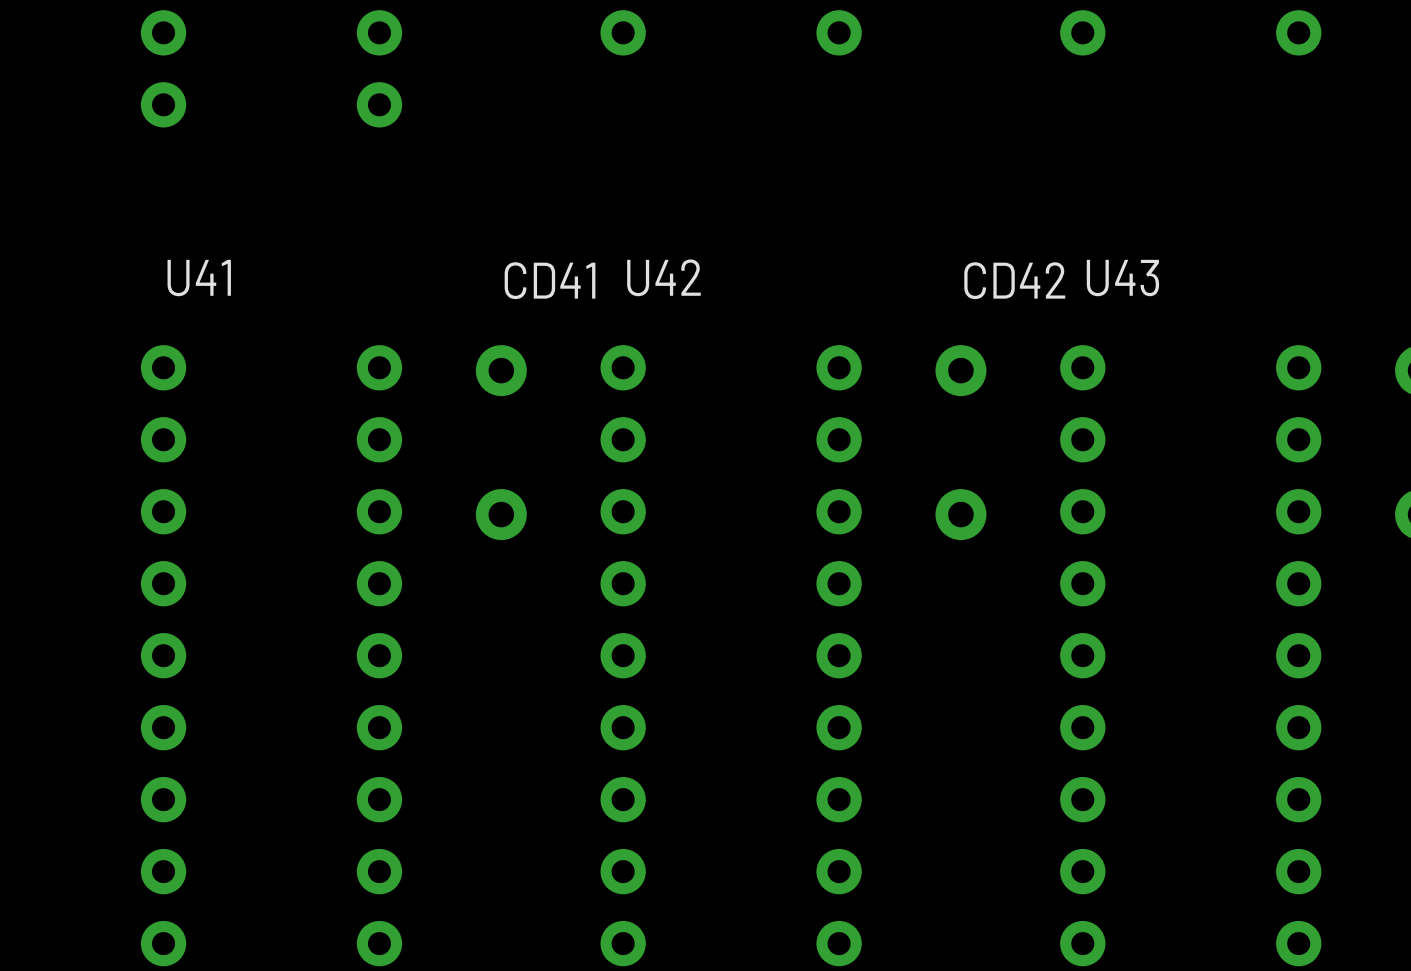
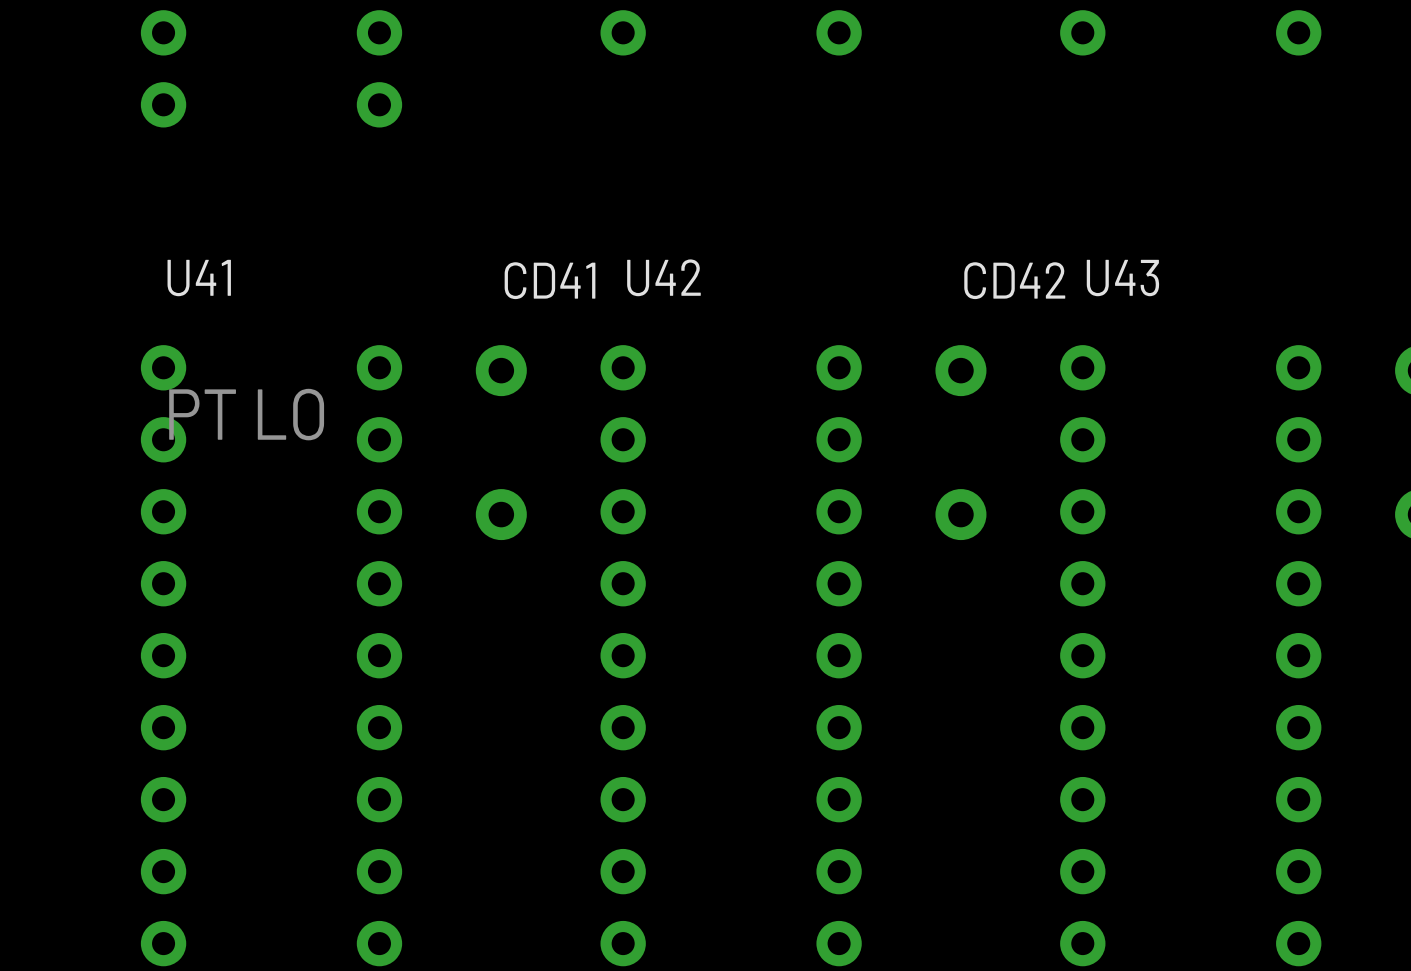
U41 value: none -> PT LO (246, 414)

